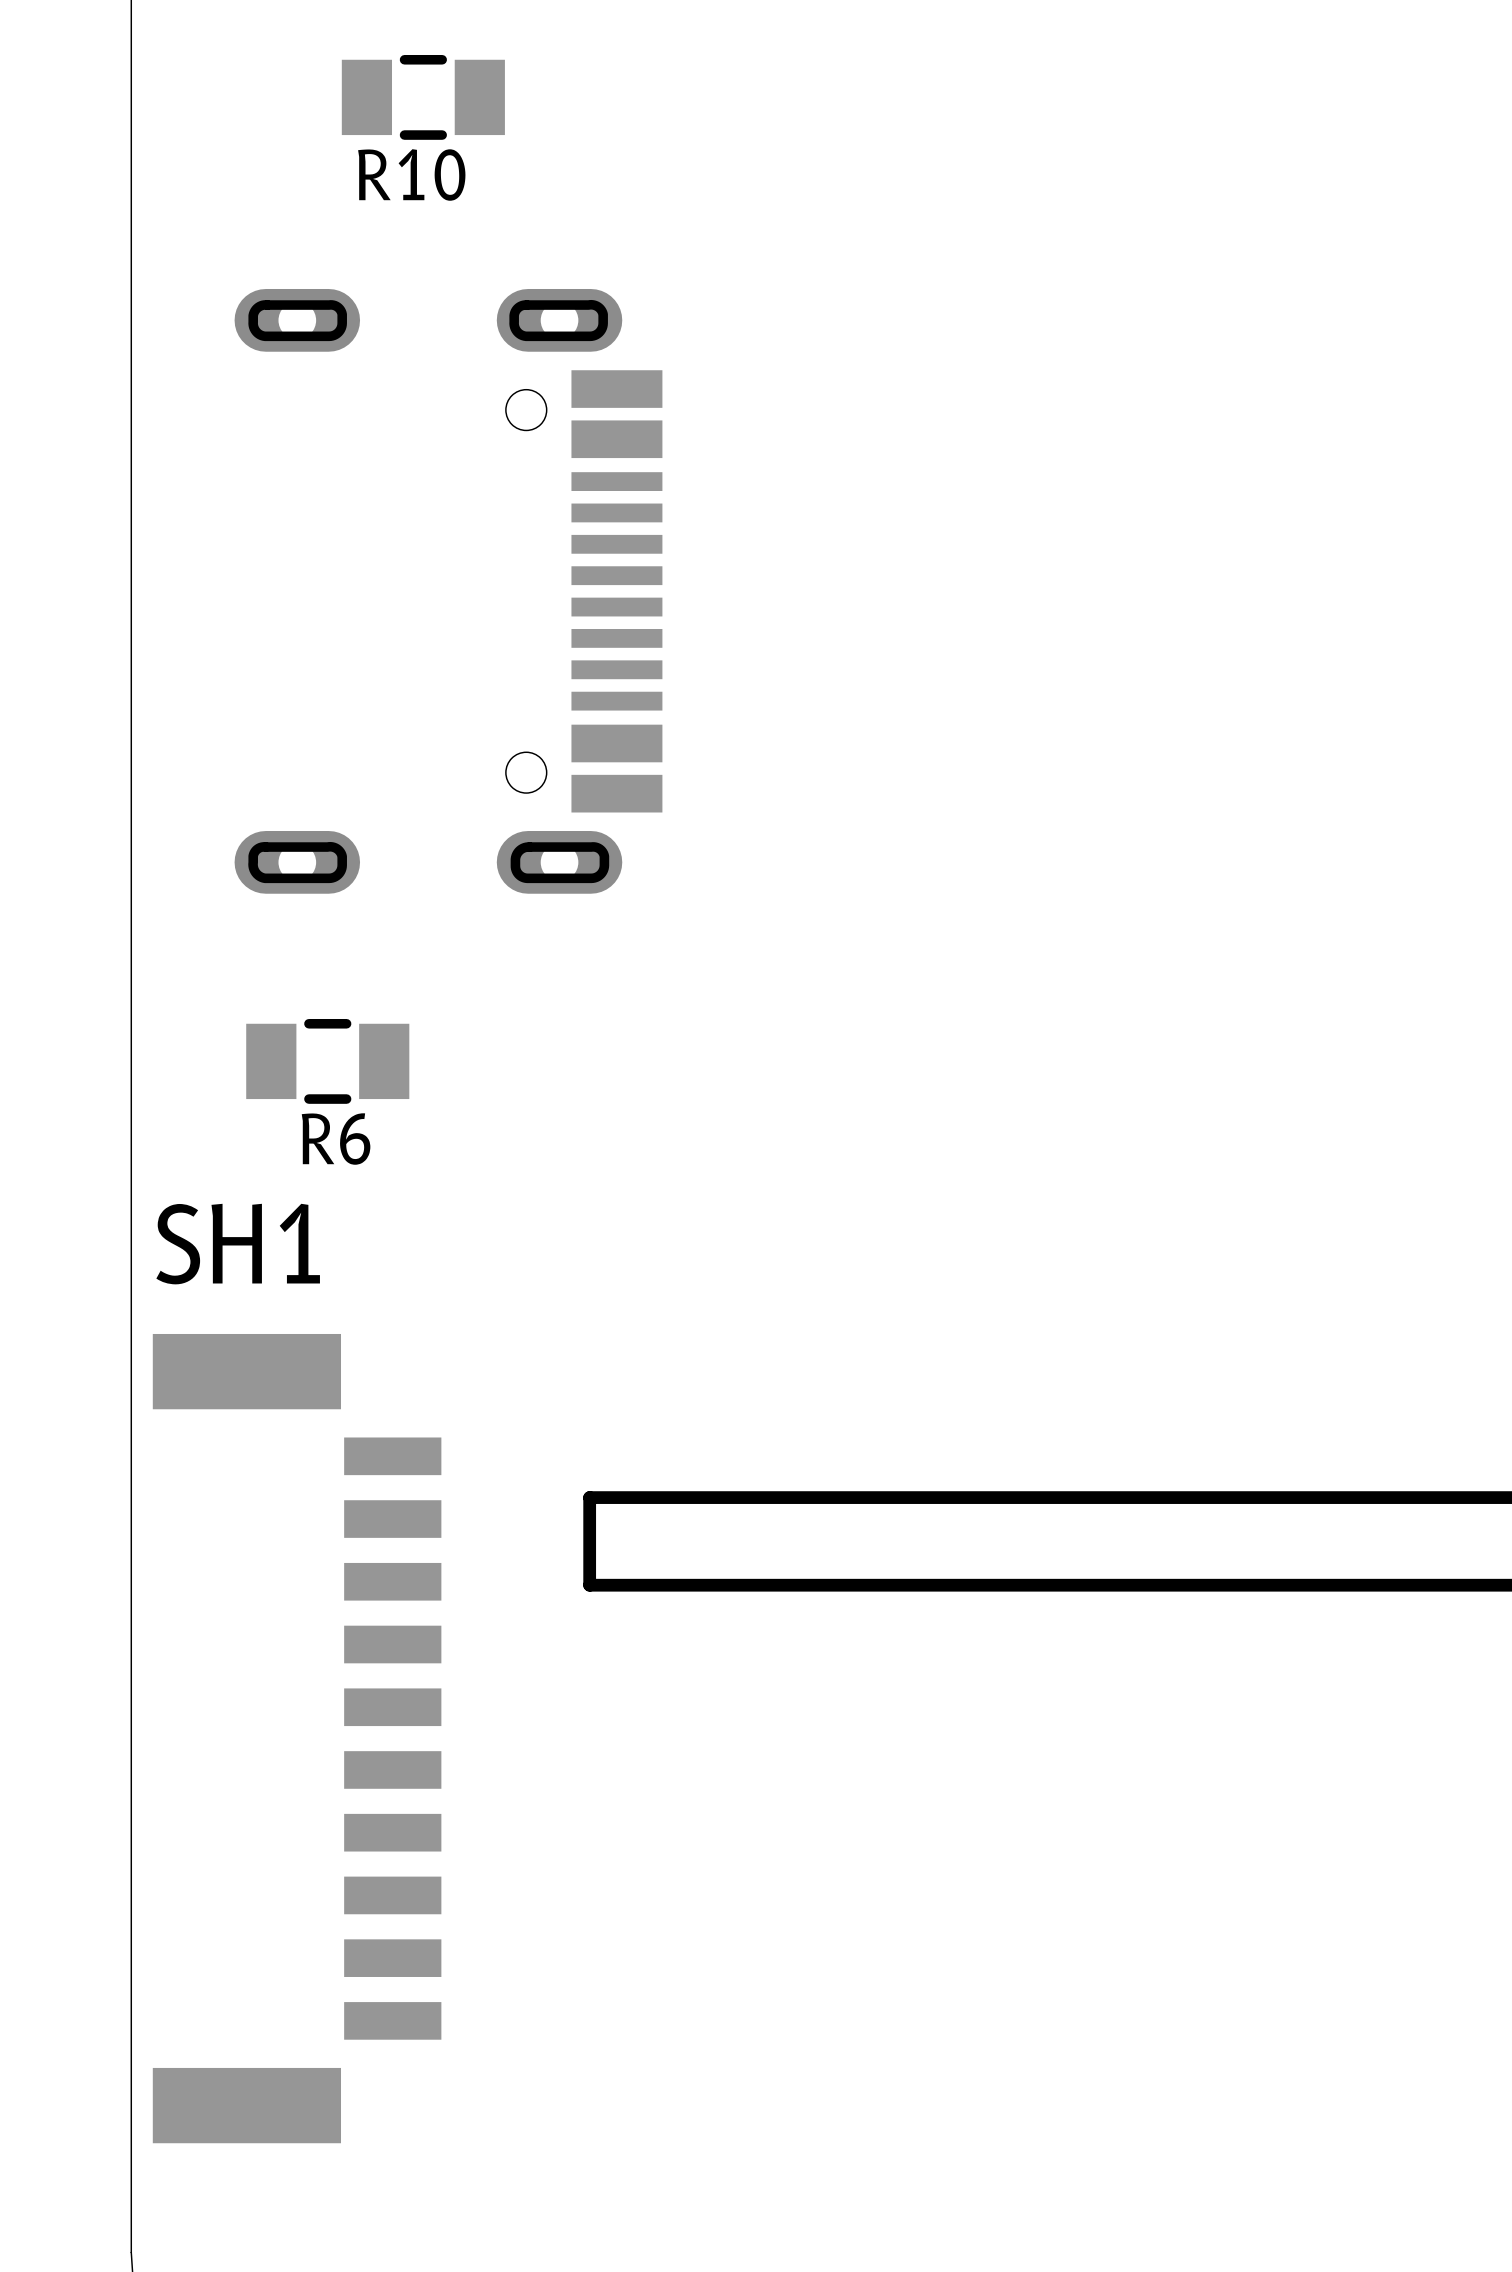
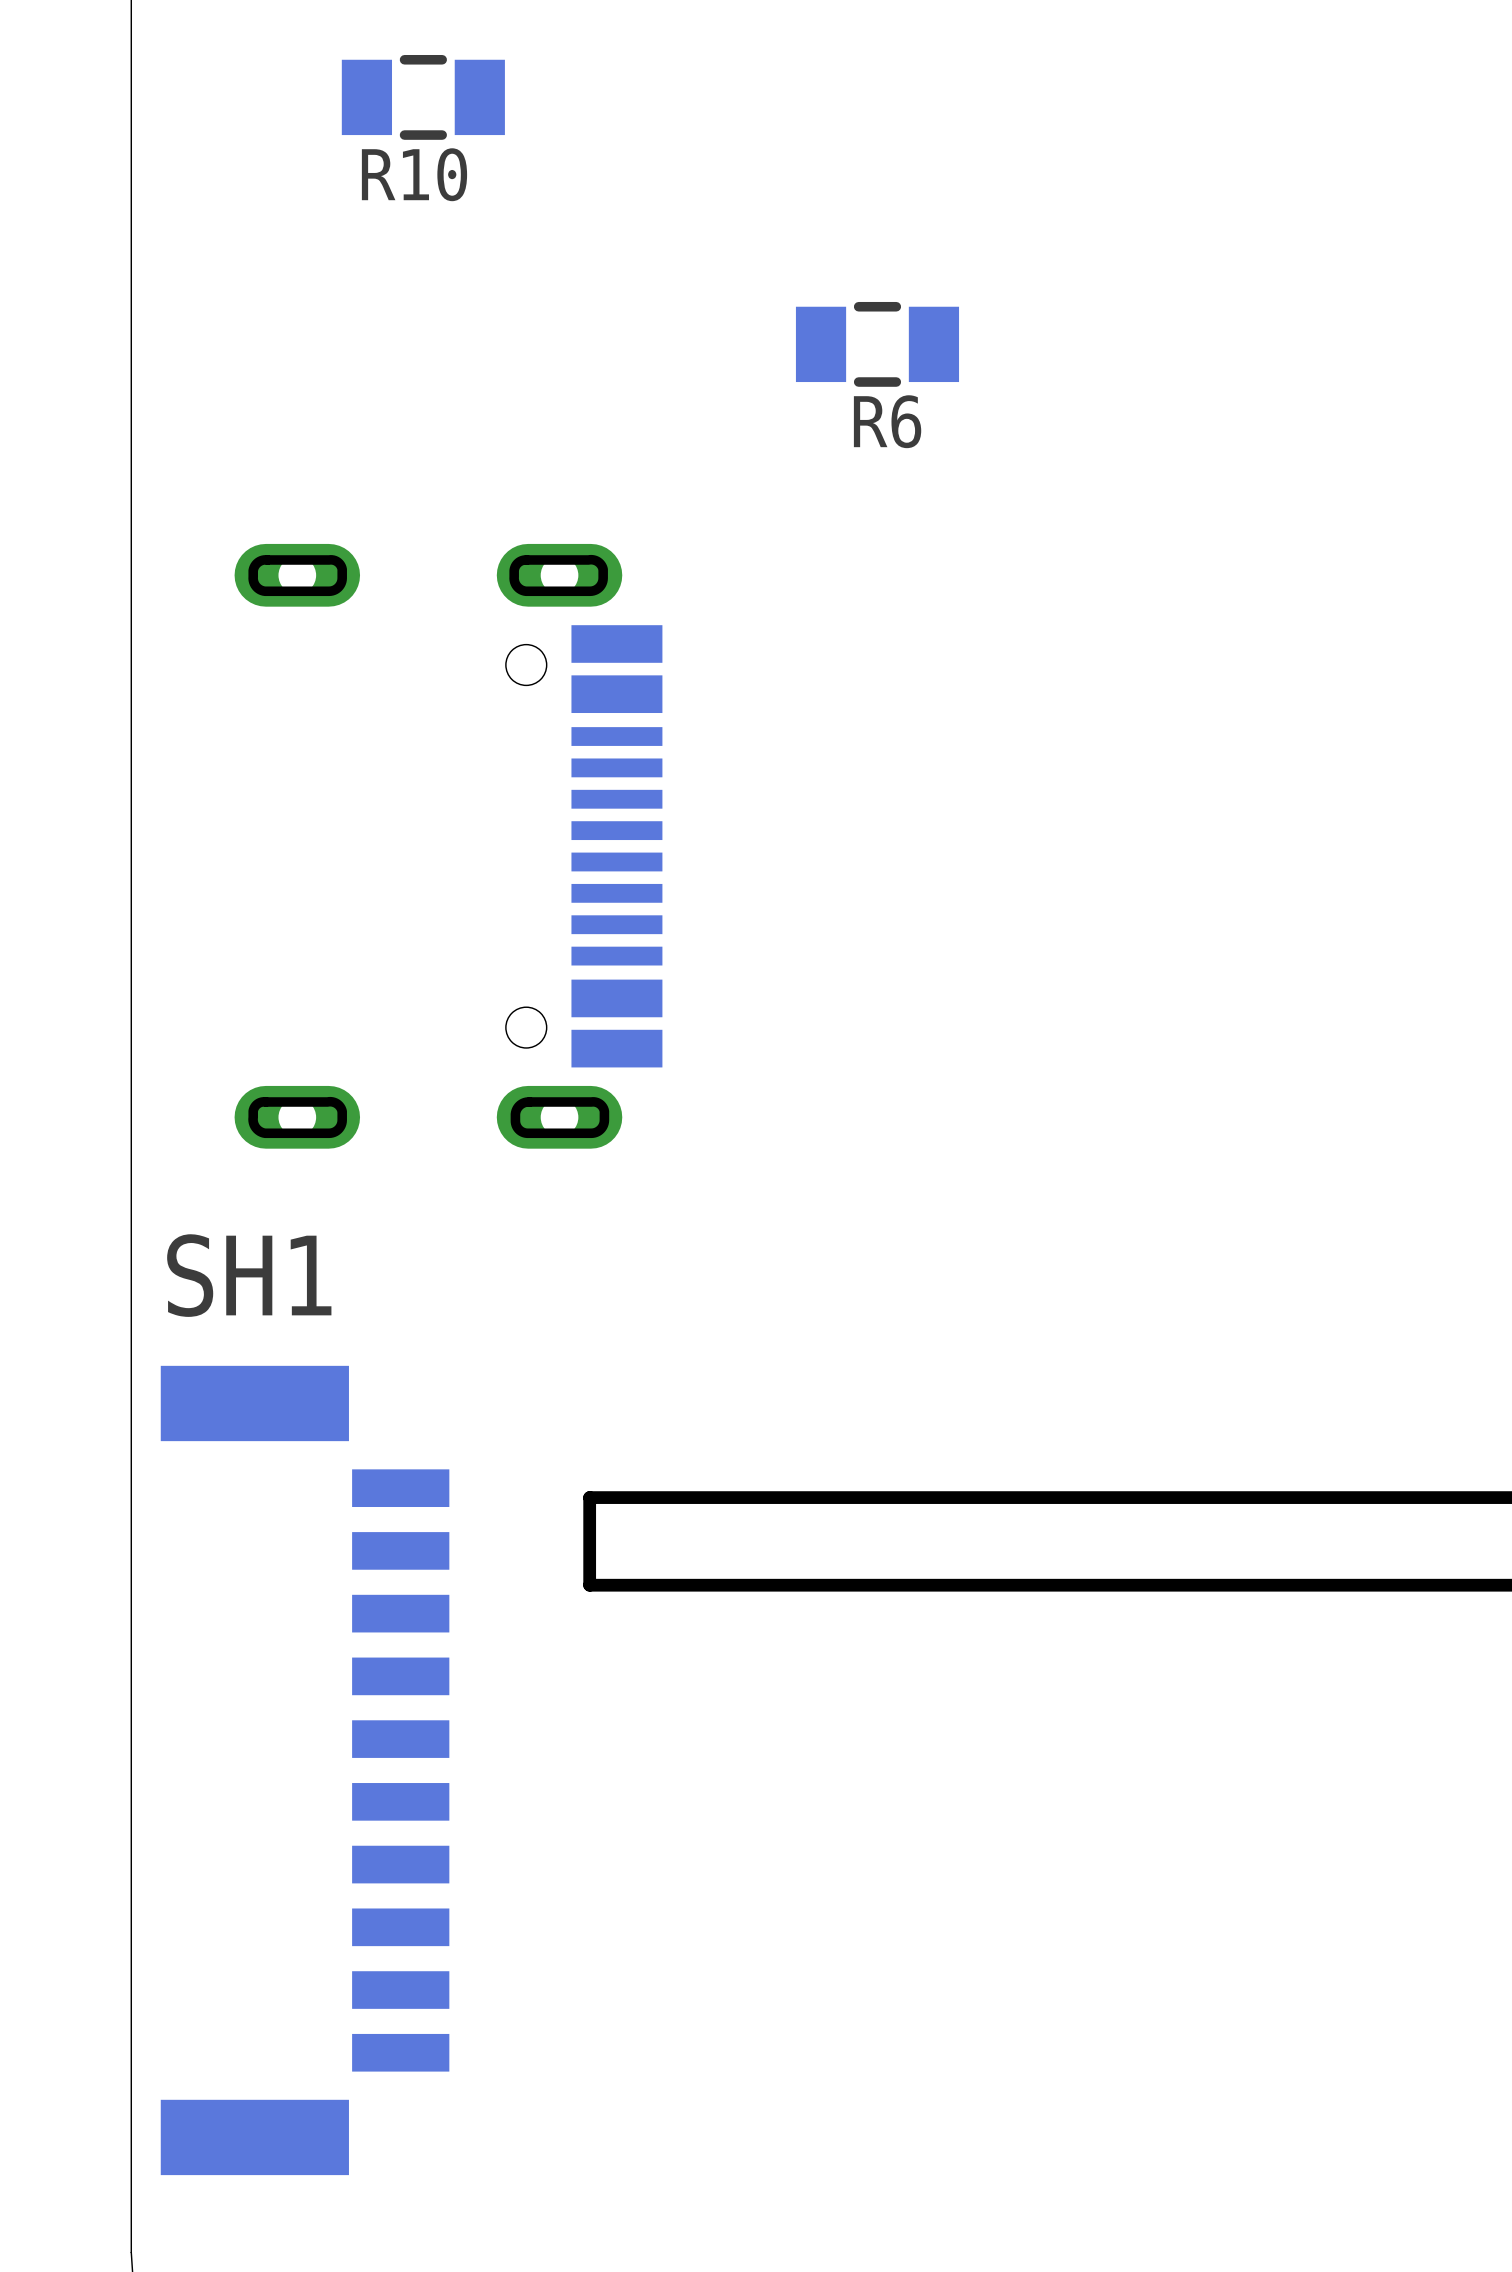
part position: (448, 591) -> (448, 846)
R6 position: (327, 1061) -> (877, 344)
SH1 position: (297, 1738) -> (305, 1770)

